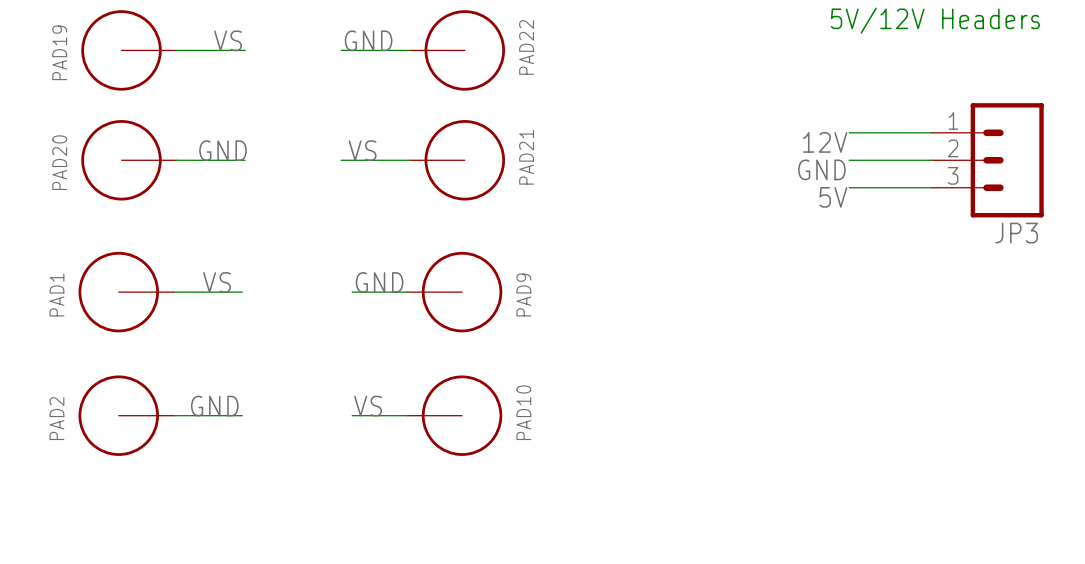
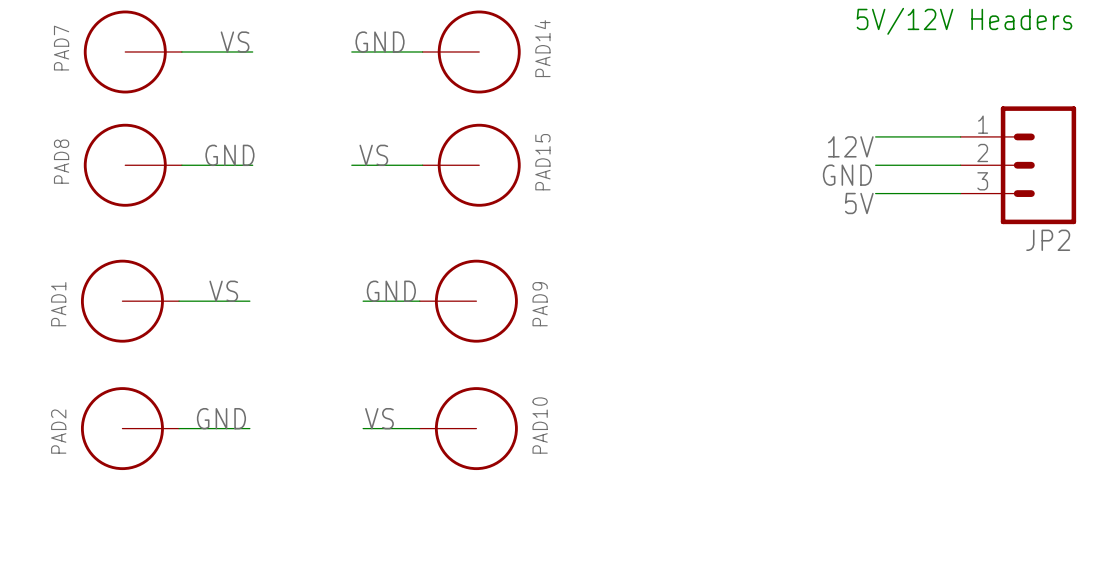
PAD22 name: PAD22 (526, 47) -> PAD14 (542, 48)
PAD19 name: PAD19 (59, 52) -> PAD7 (61, 48)
PAD21 name: PAD21 (526, 157) -> PAD15 (542, 162)
PAD20 name: PAD20 (59, 162) -> PAD8 (61, 161)
JP3 name: JP3 (1016, 233) -> JP2 (1048, 240)

